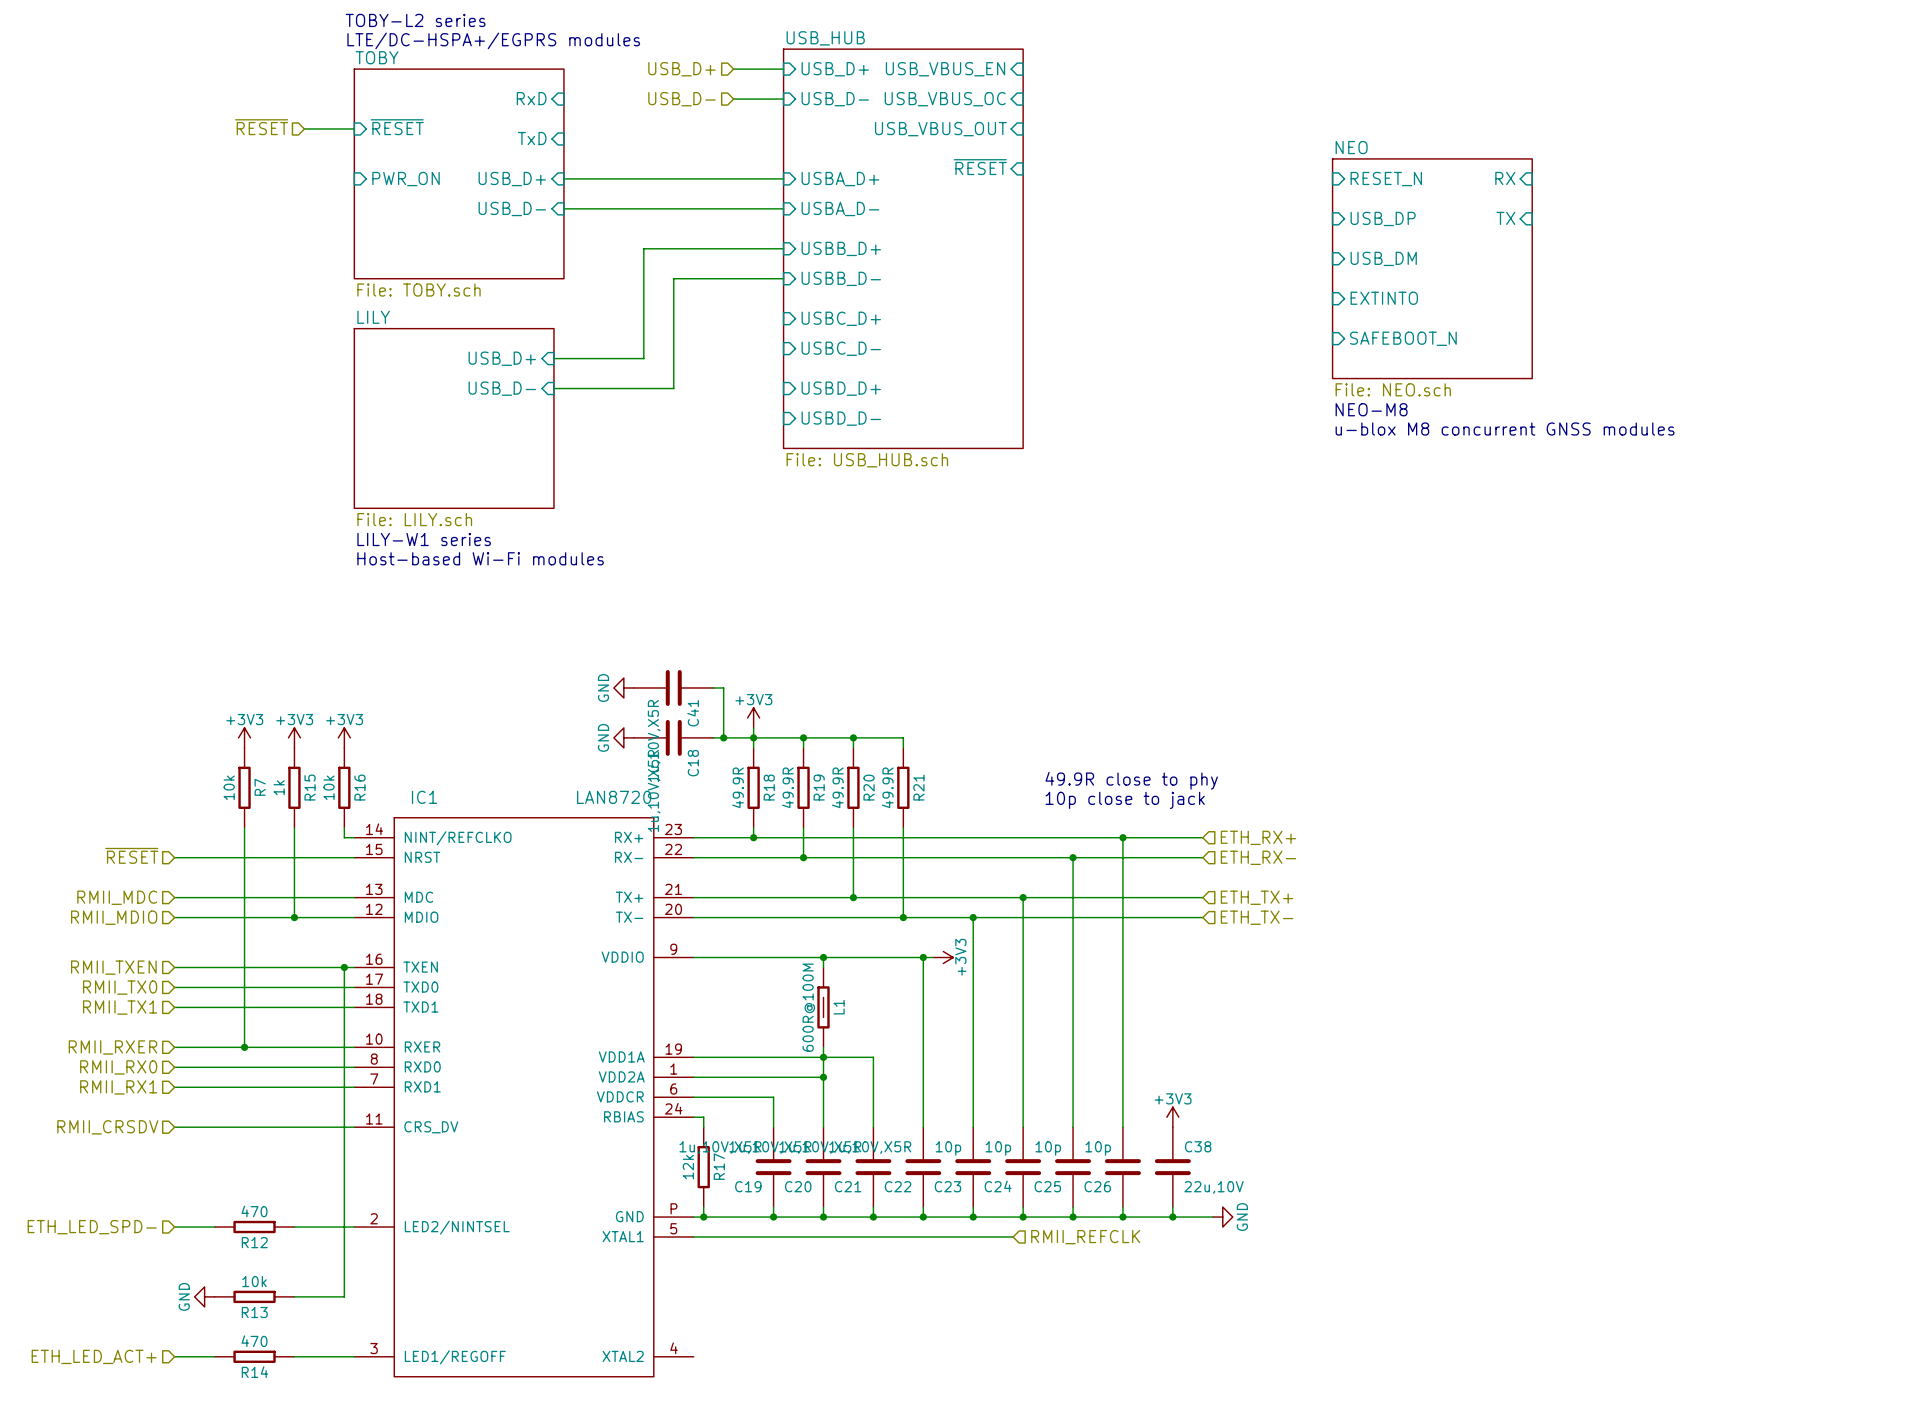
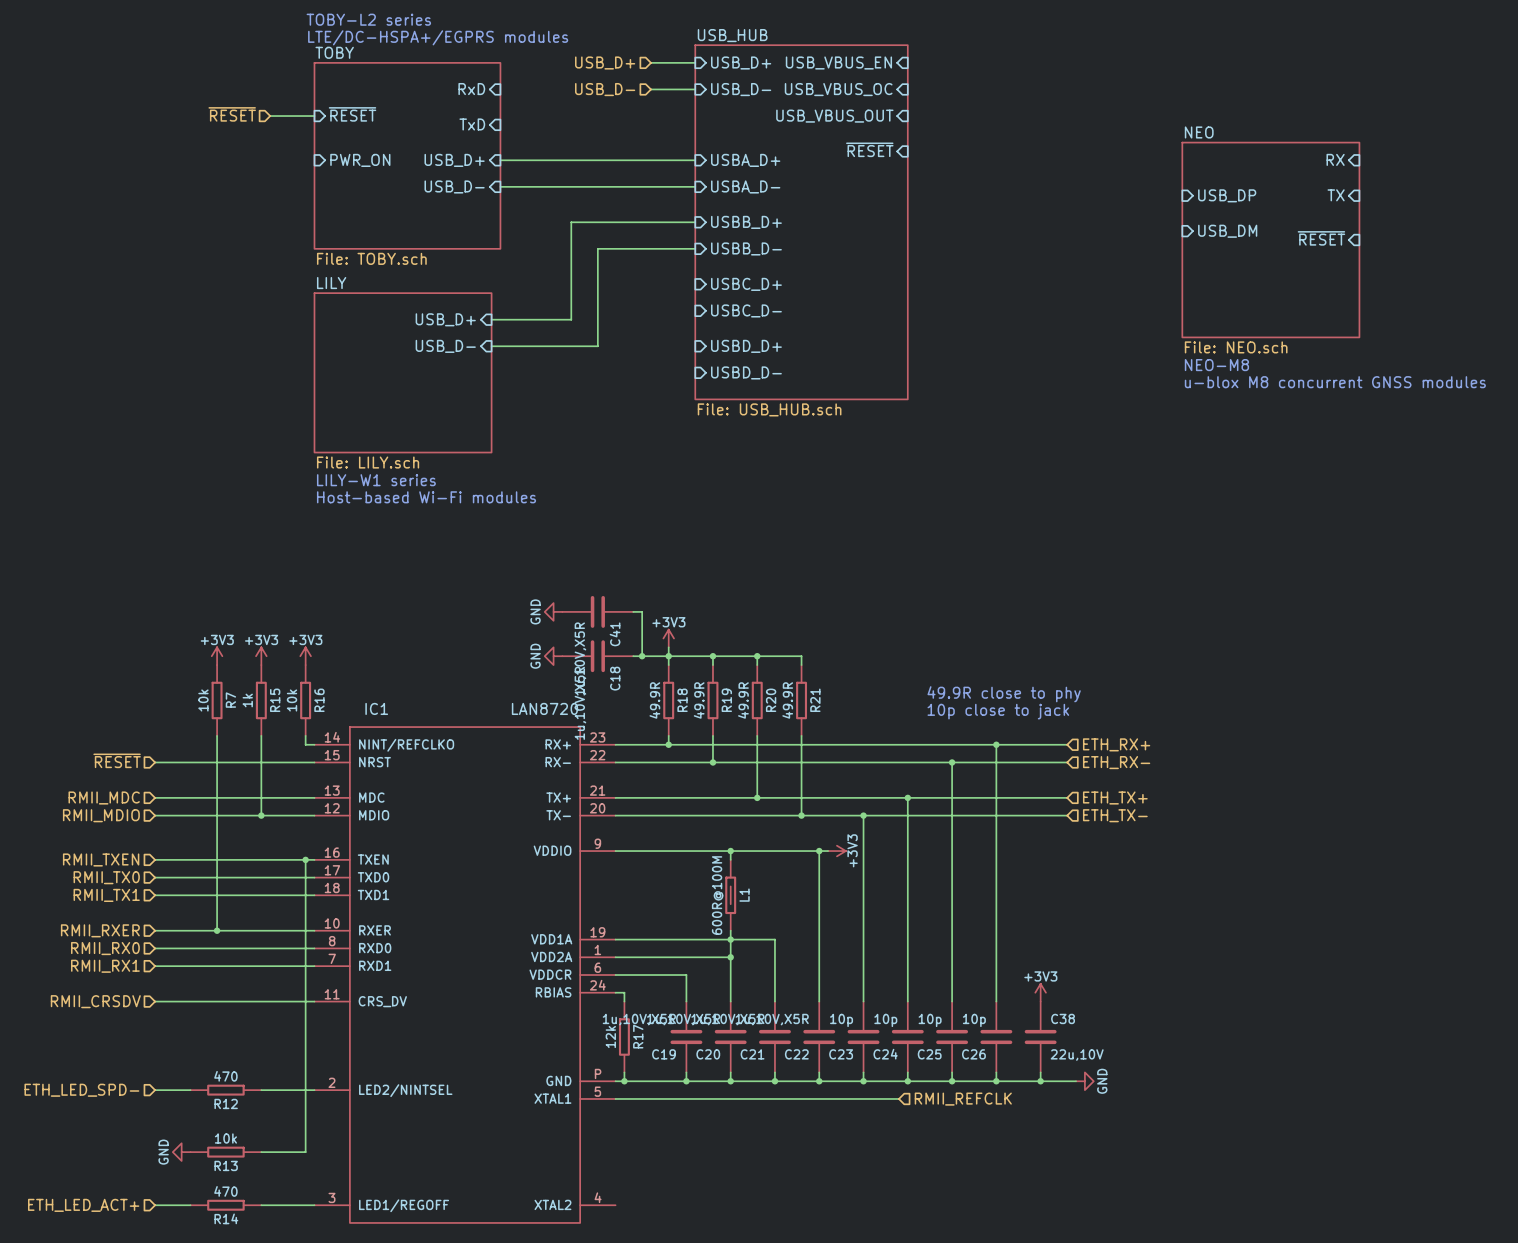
sheet pin: RESET_N (1386, 179) -> none
sheet pin: none -> ~{RESET} (1321, 238)
sheet pin: EXTINTO (1384, 298) -> none
sheet pin: SAFEBOOT_N (1403, 338) -> none

